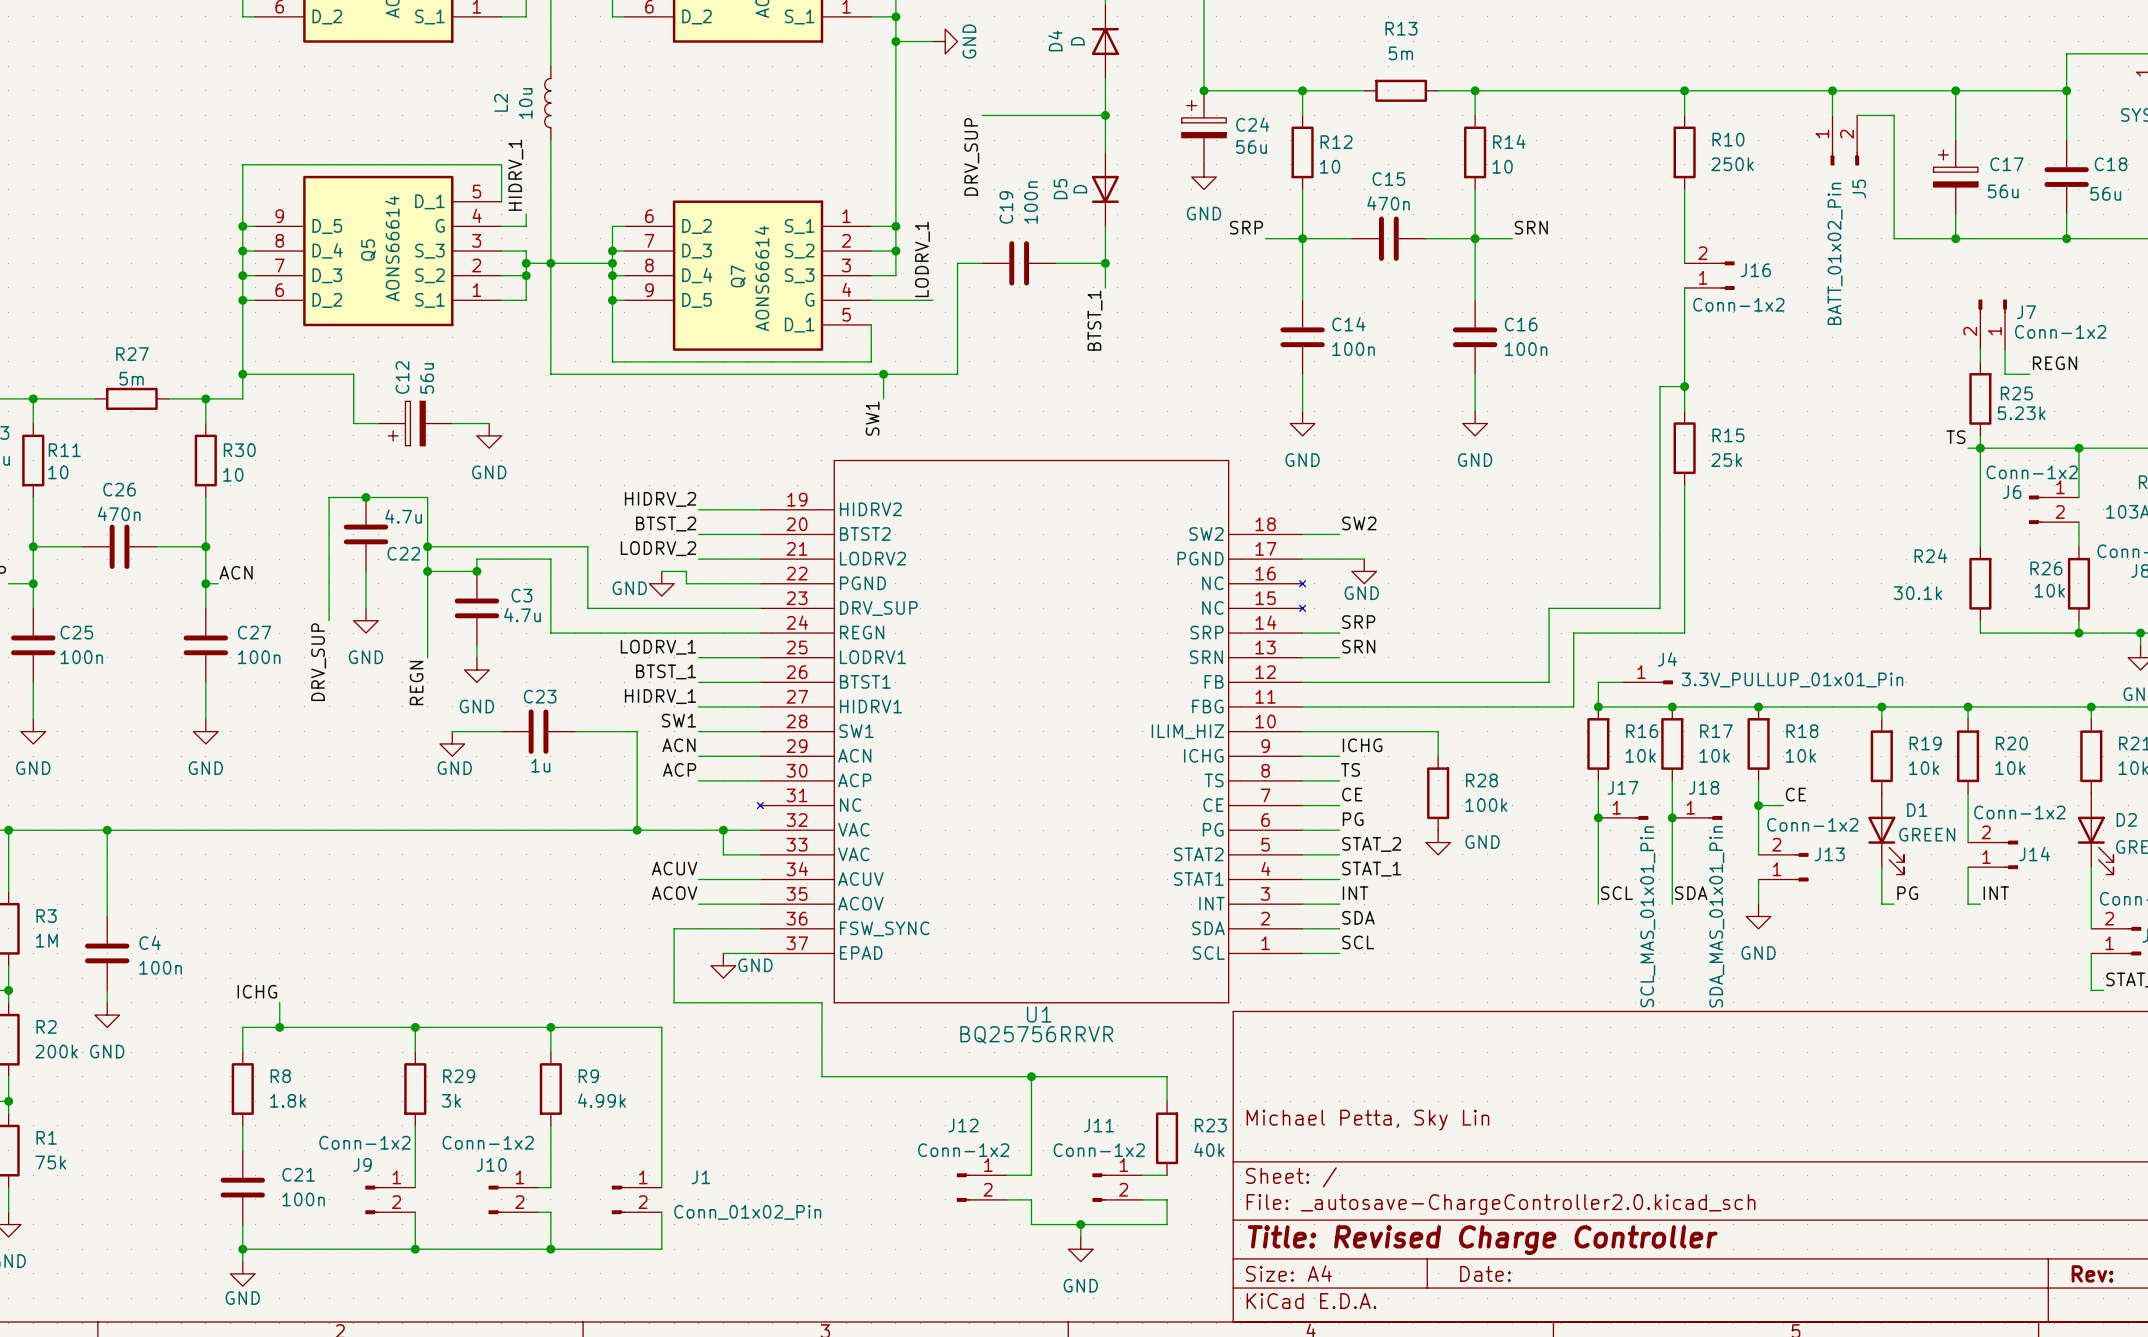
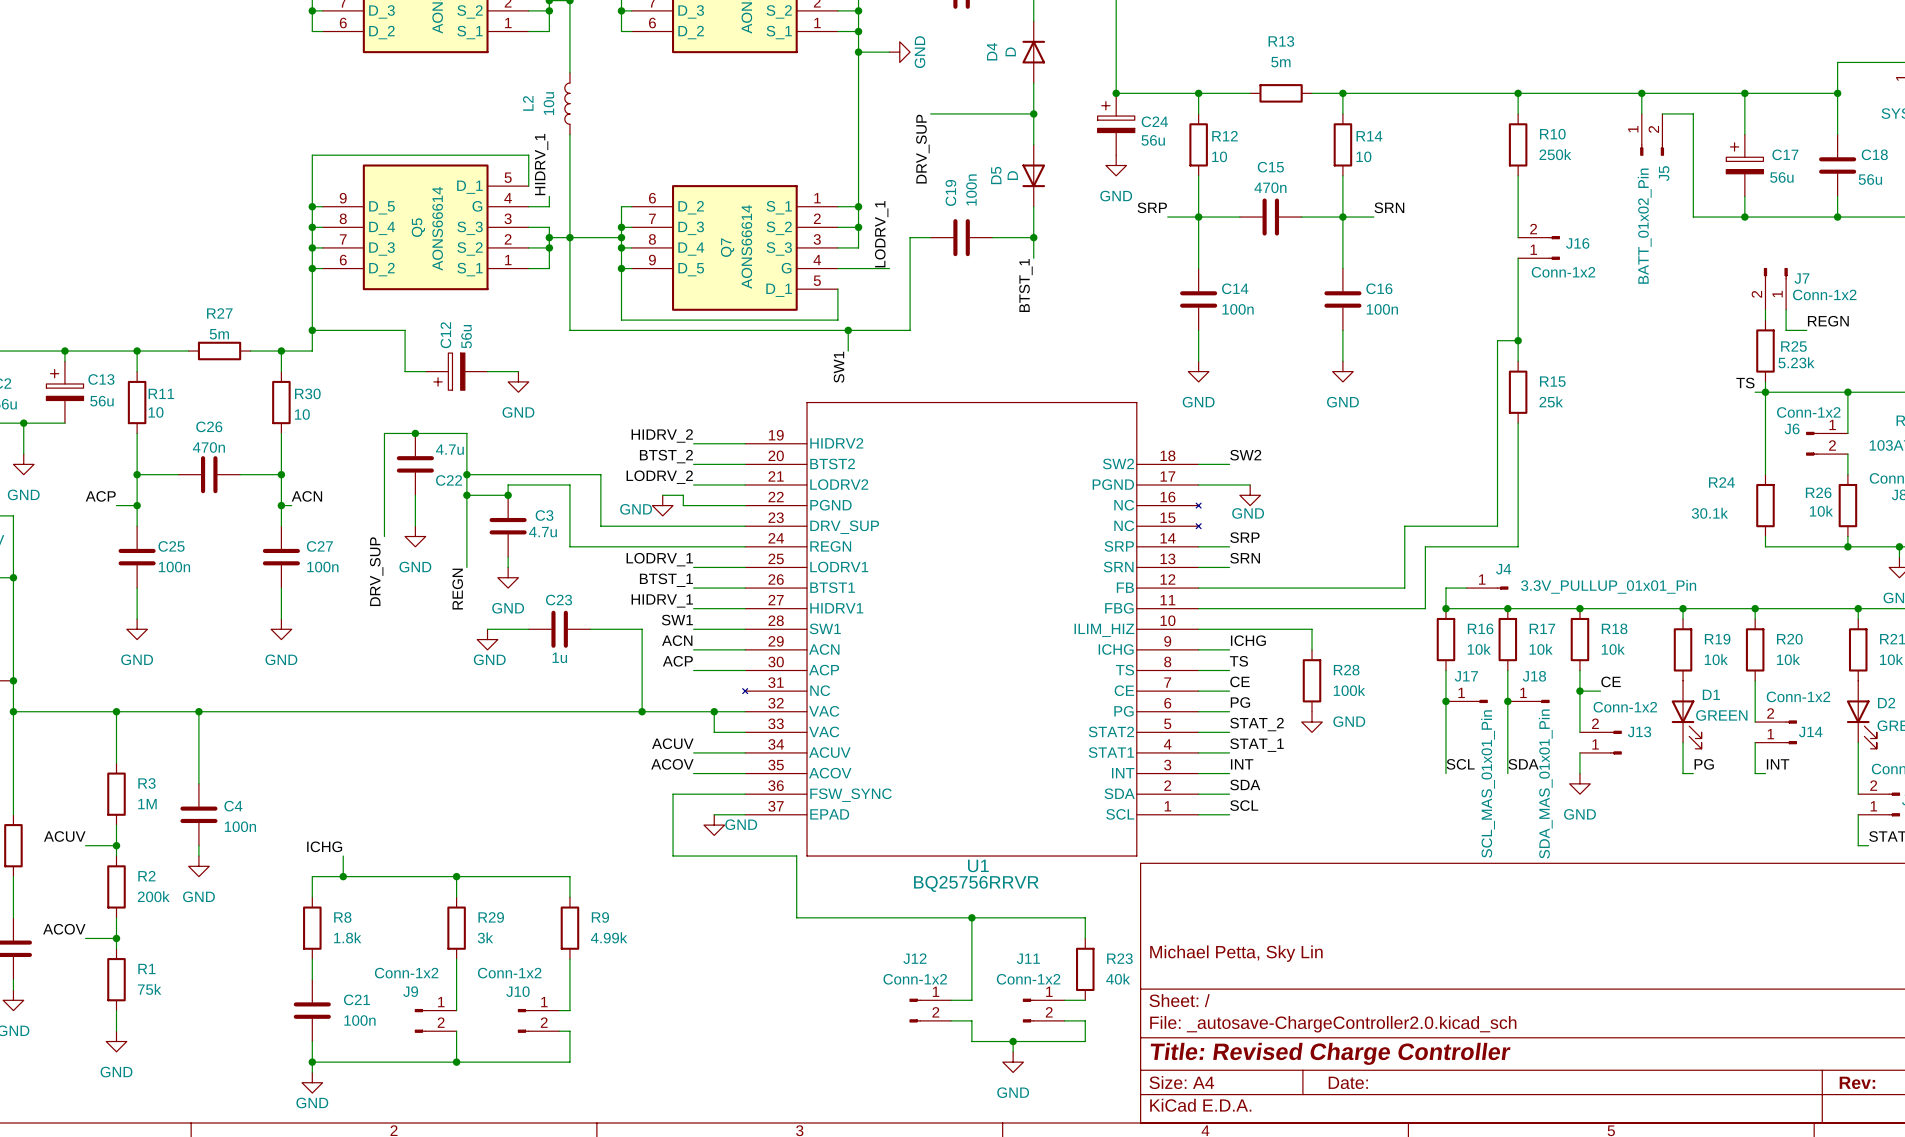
wire: (550, 1027) (661, 1027) (661, 1187) -> none
junction: (550, 1027) -> none
J1: Conn_01x02_Pin (636, 1199) -> none
wire: (661, 1212) (661, 1249) (550, 1249) -> none
junction: (550, 1249) -> none

